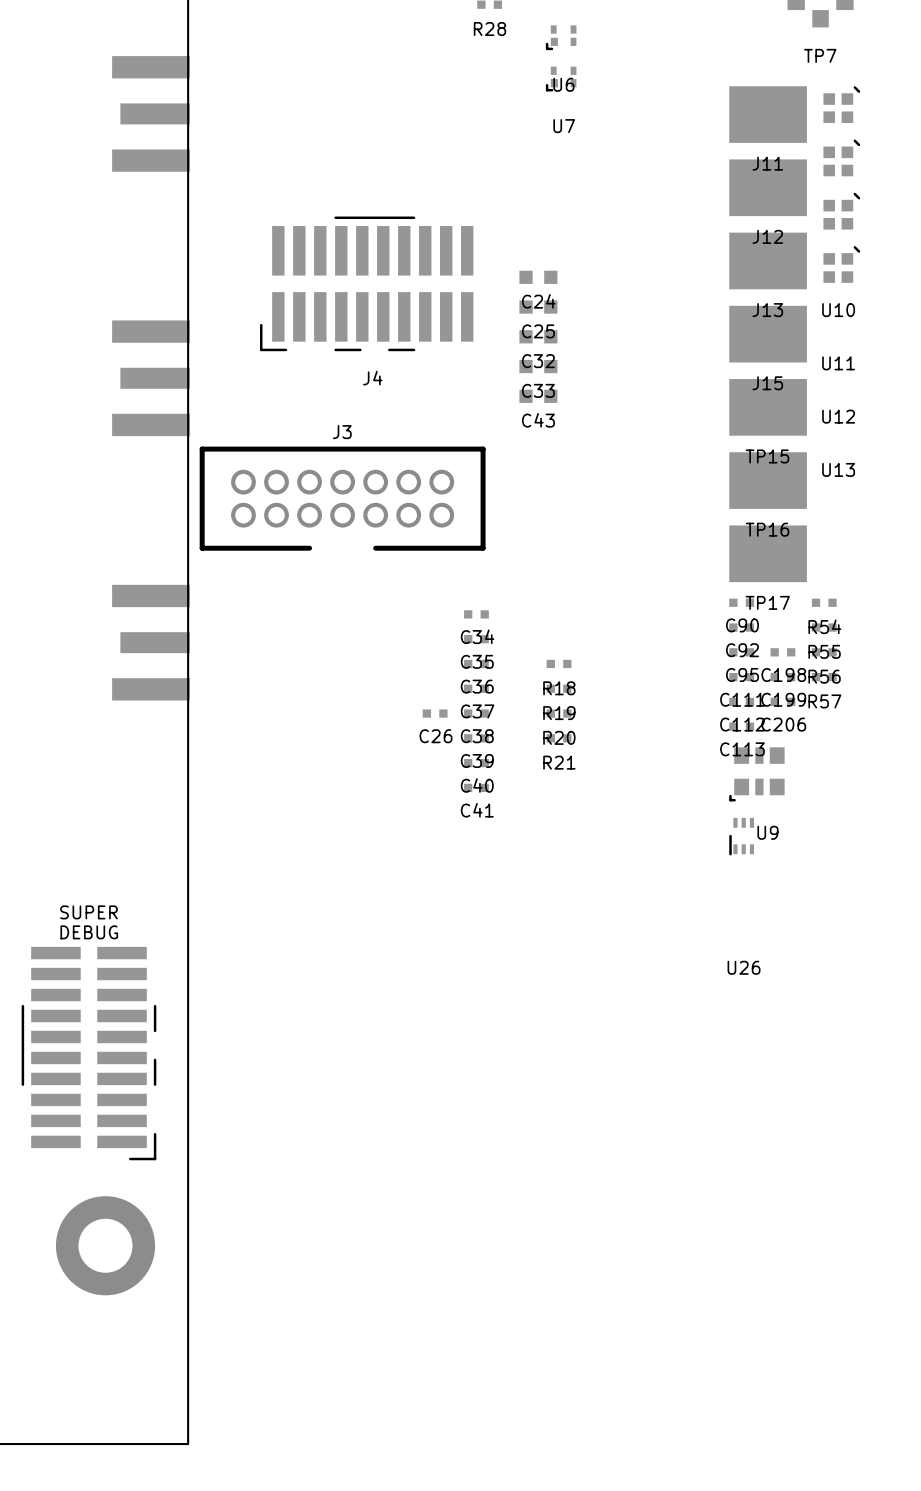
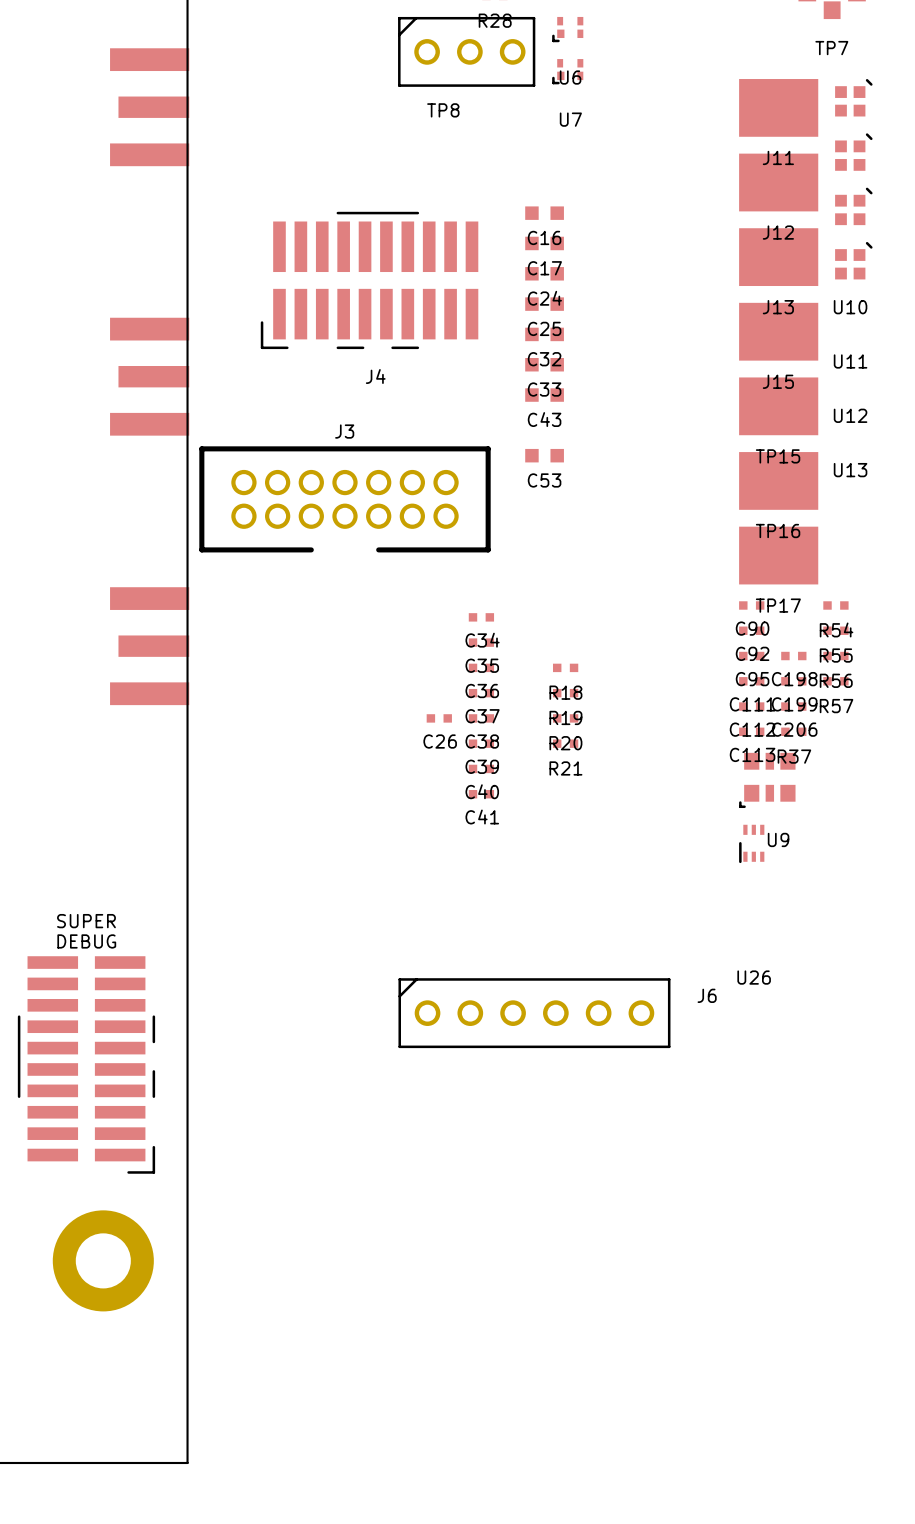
TP8: none -> (466, 51)
C16: none -> (544, 213)
C17: none -> (544, 243)
C53: none -> (544, 455)
R37: none -> (793, 731)
J6: none -> (534, 1013)

